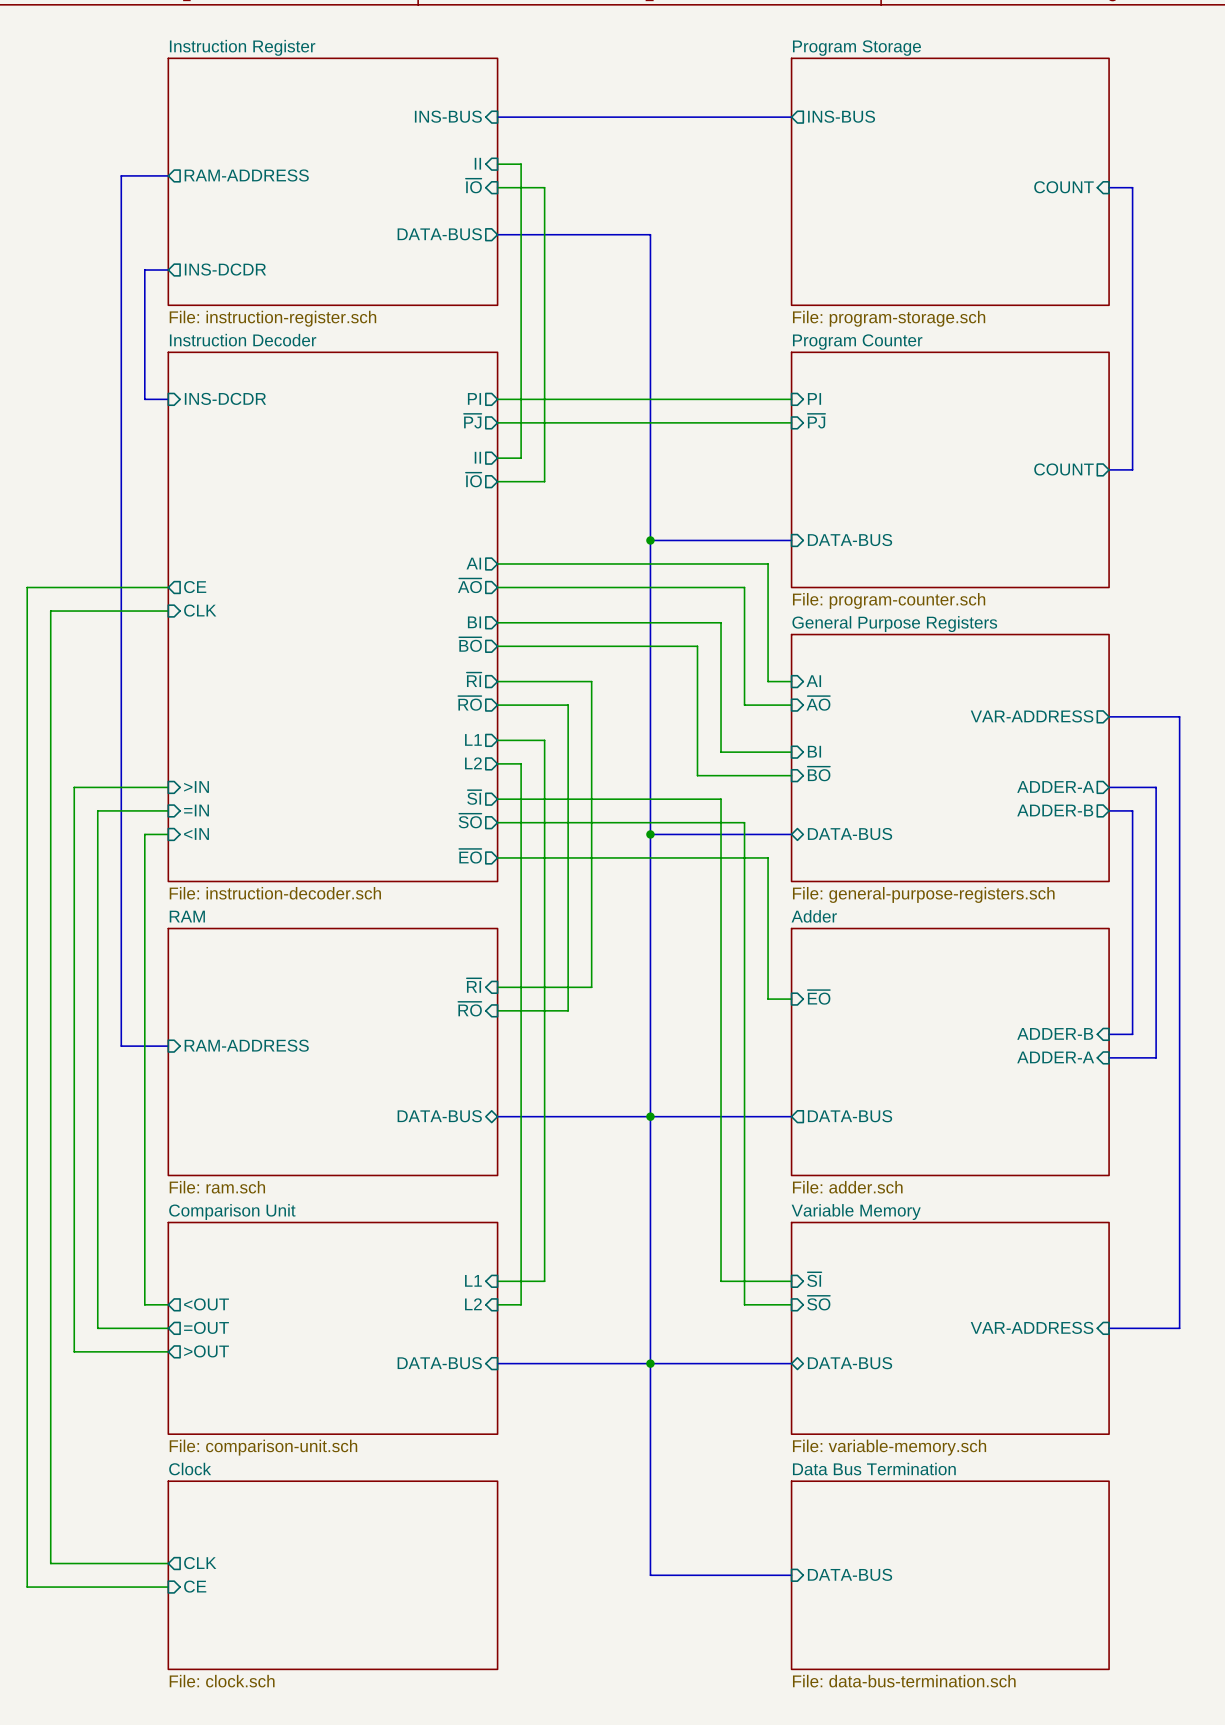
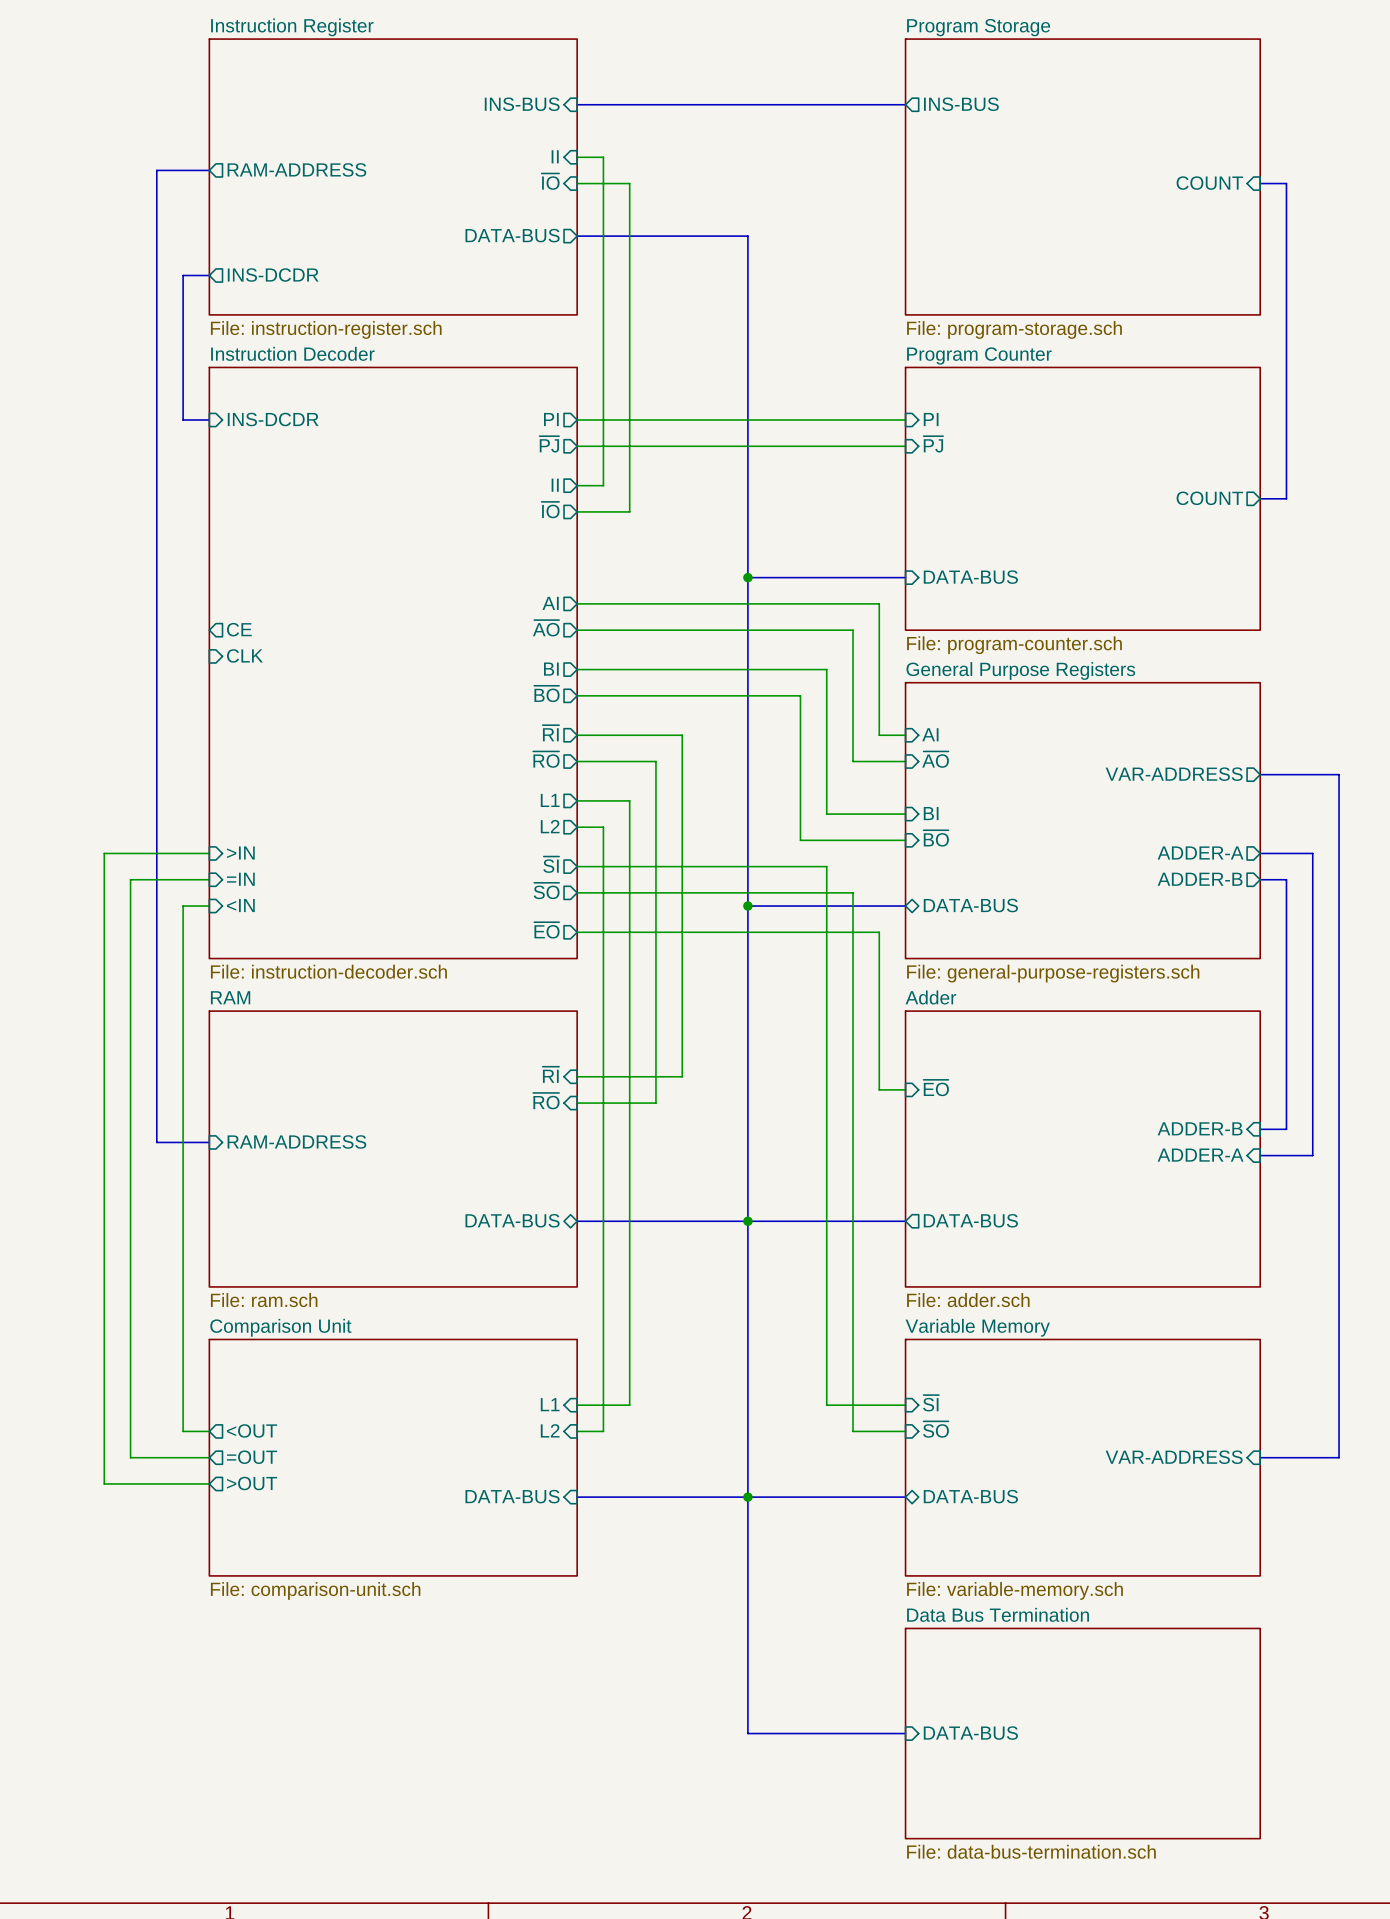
wire: (168, 587) (27, 587) (27, 1587) (168, 1587) -> none
wire: (168, 611) (50, 611) (50, 1563) (168, 1563) -> none
sheet pin: CLK (200, 1563) -> none
sheet Clock: File: clock.sch (332, 1575) -> none
sheet pin: CE (195, 1586) -> none

